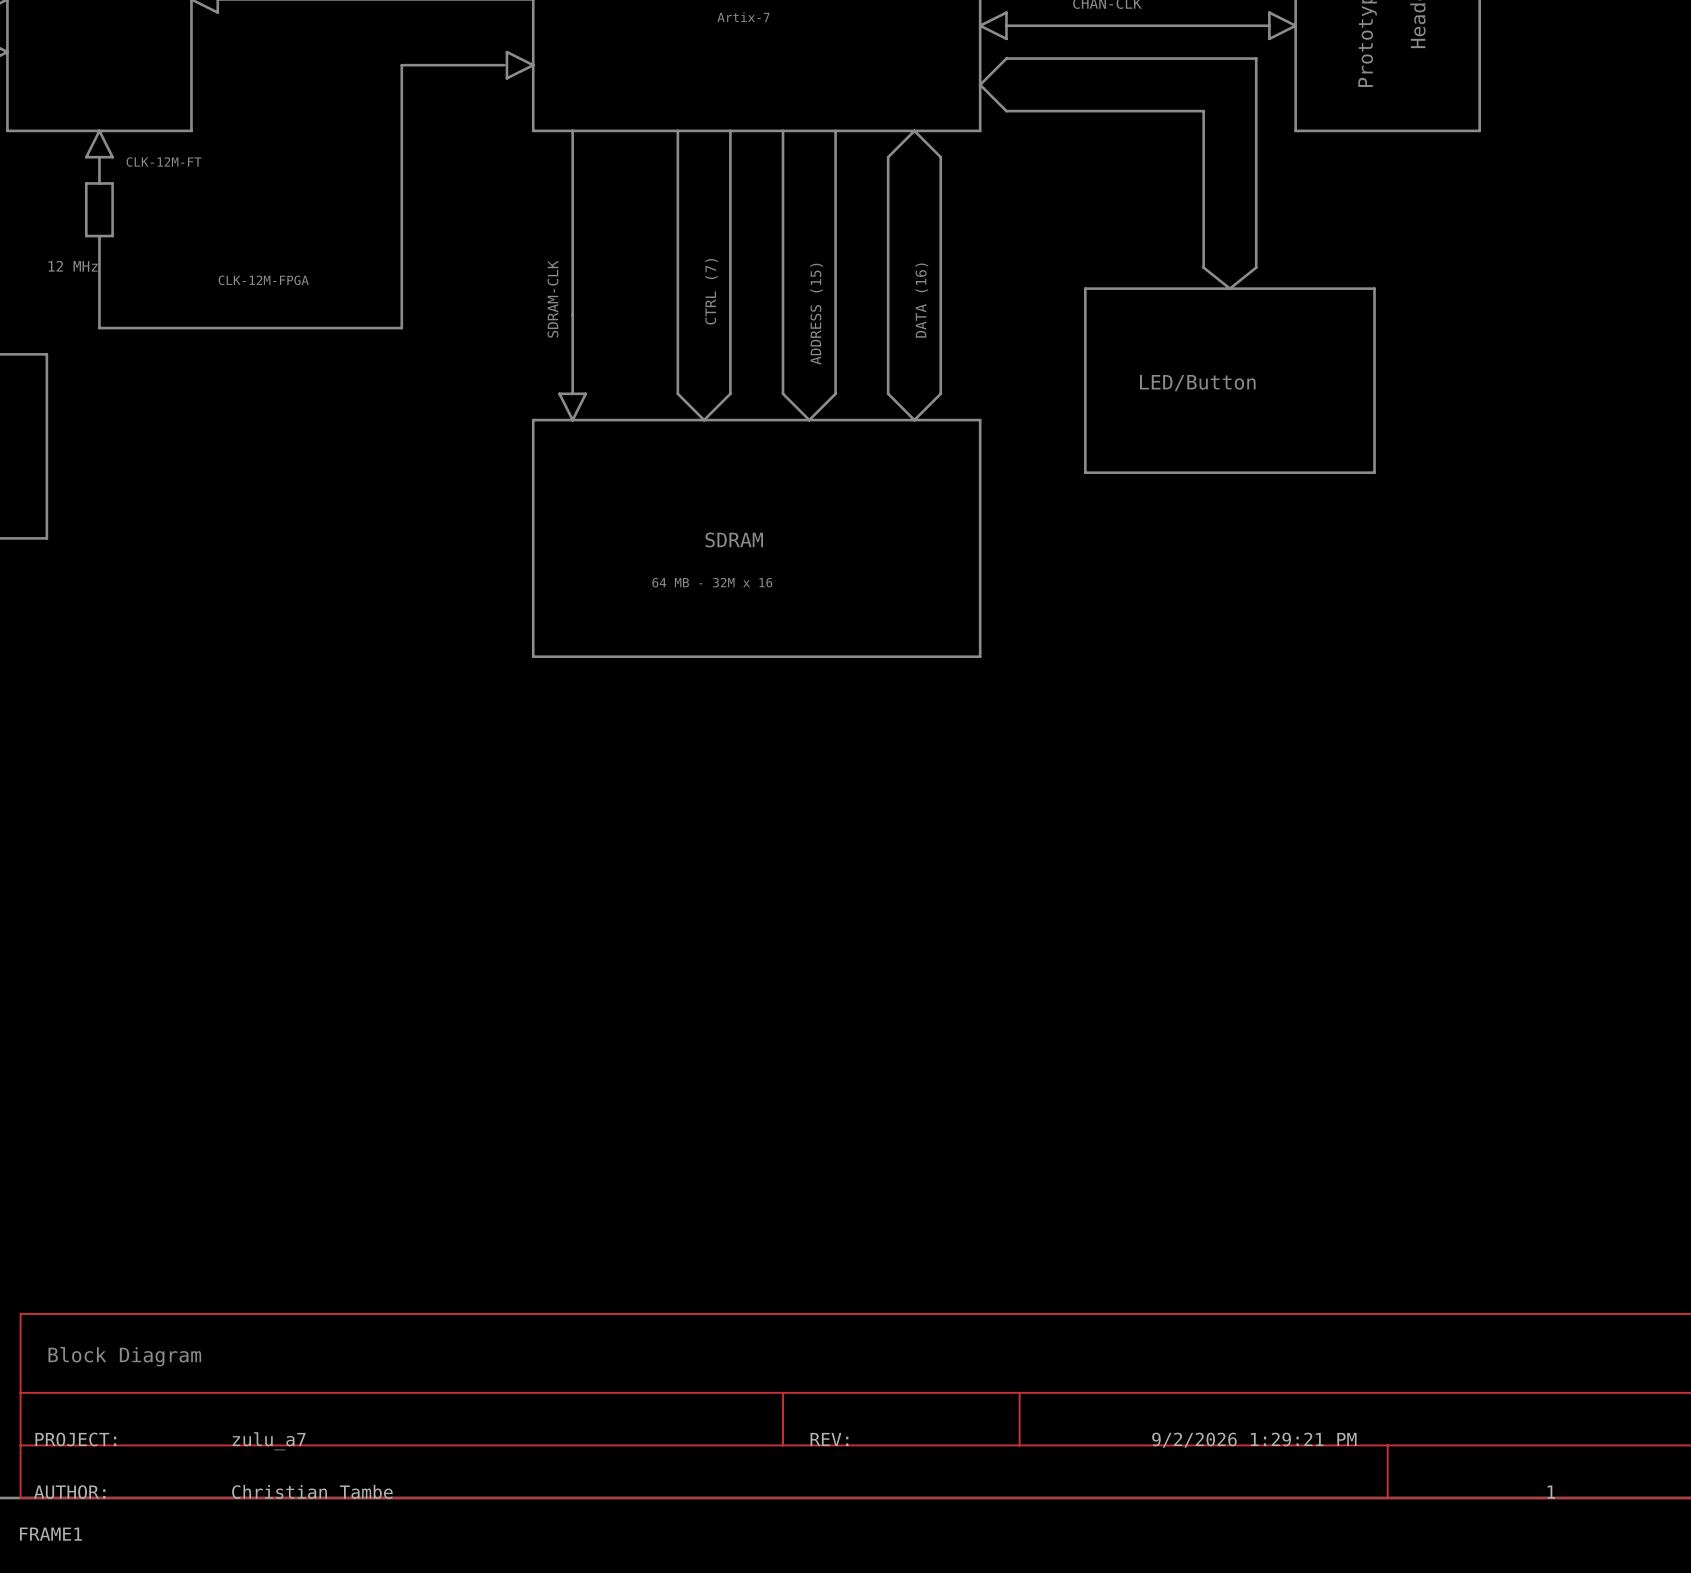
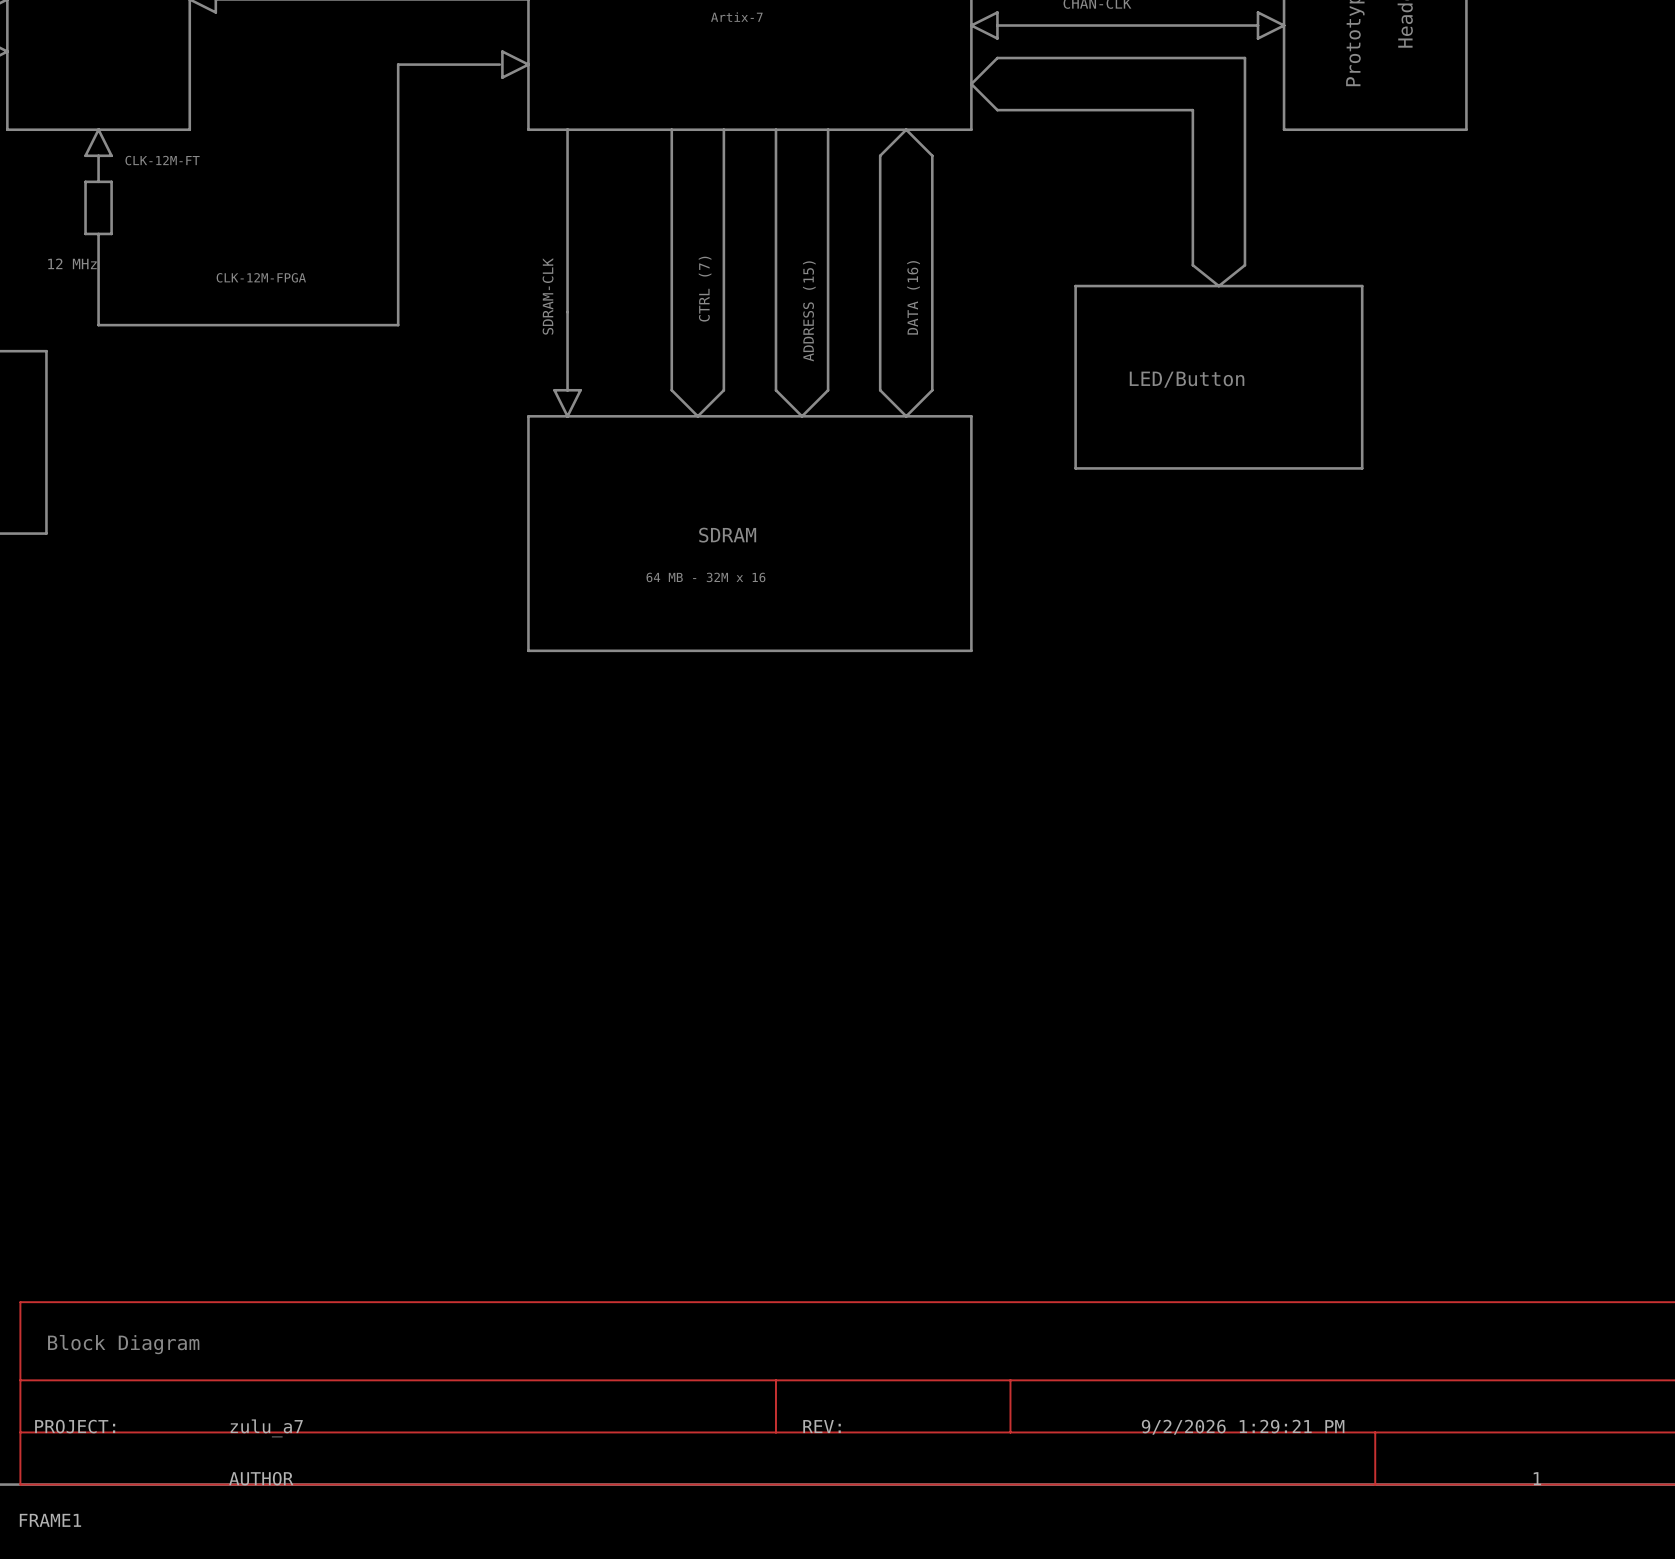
FRAME1 text: Christian Tambe (312, 1491) -> AUTHOR (261, 1478)
FRAME1 text: AUTHOR: (69, 1492) -> none

